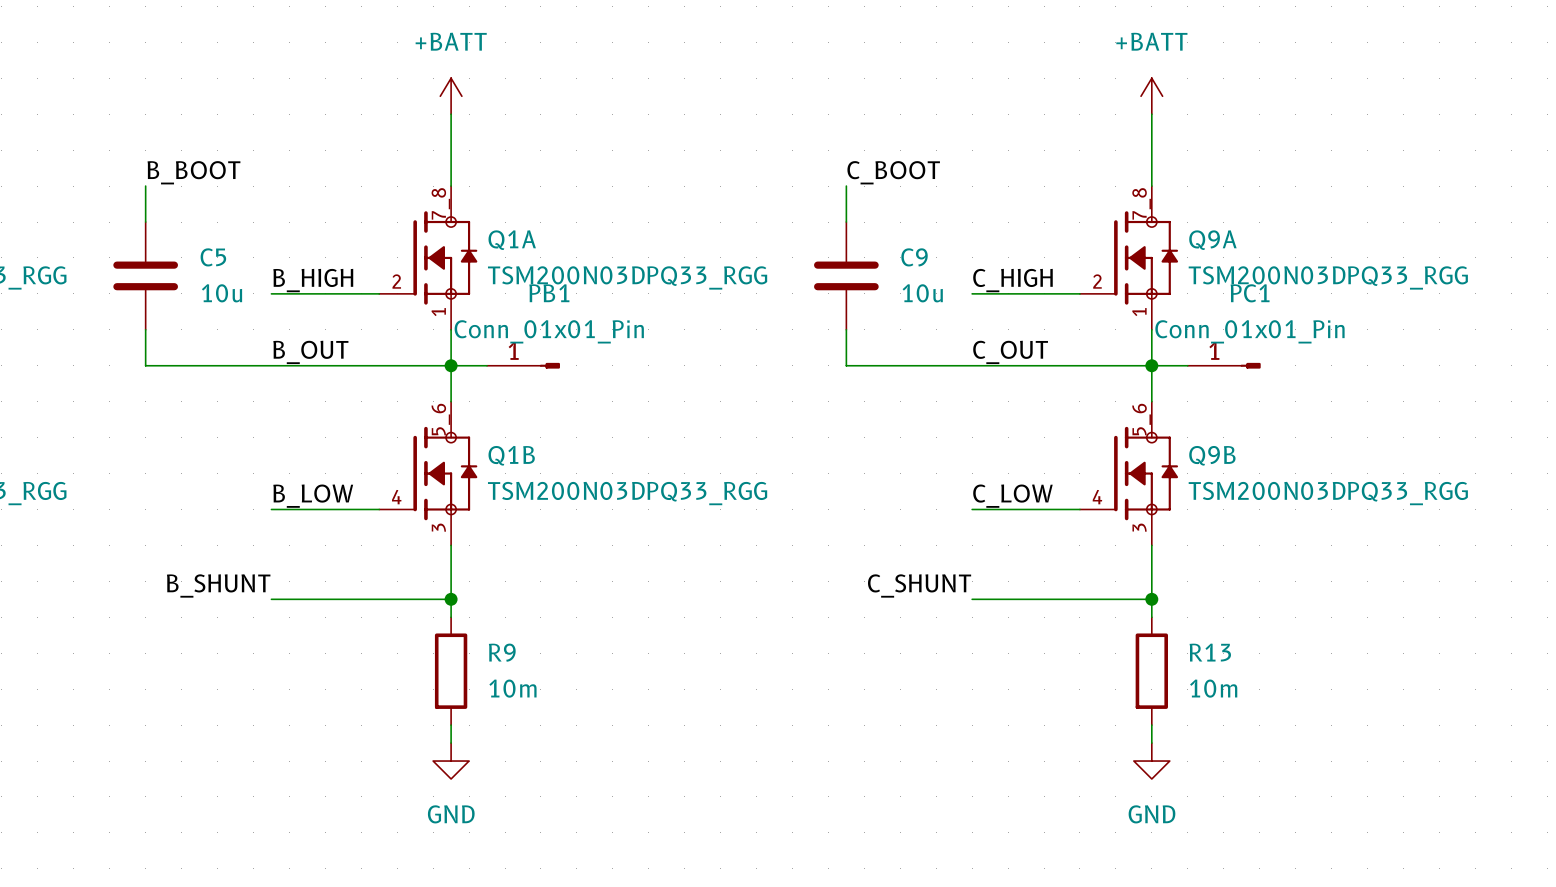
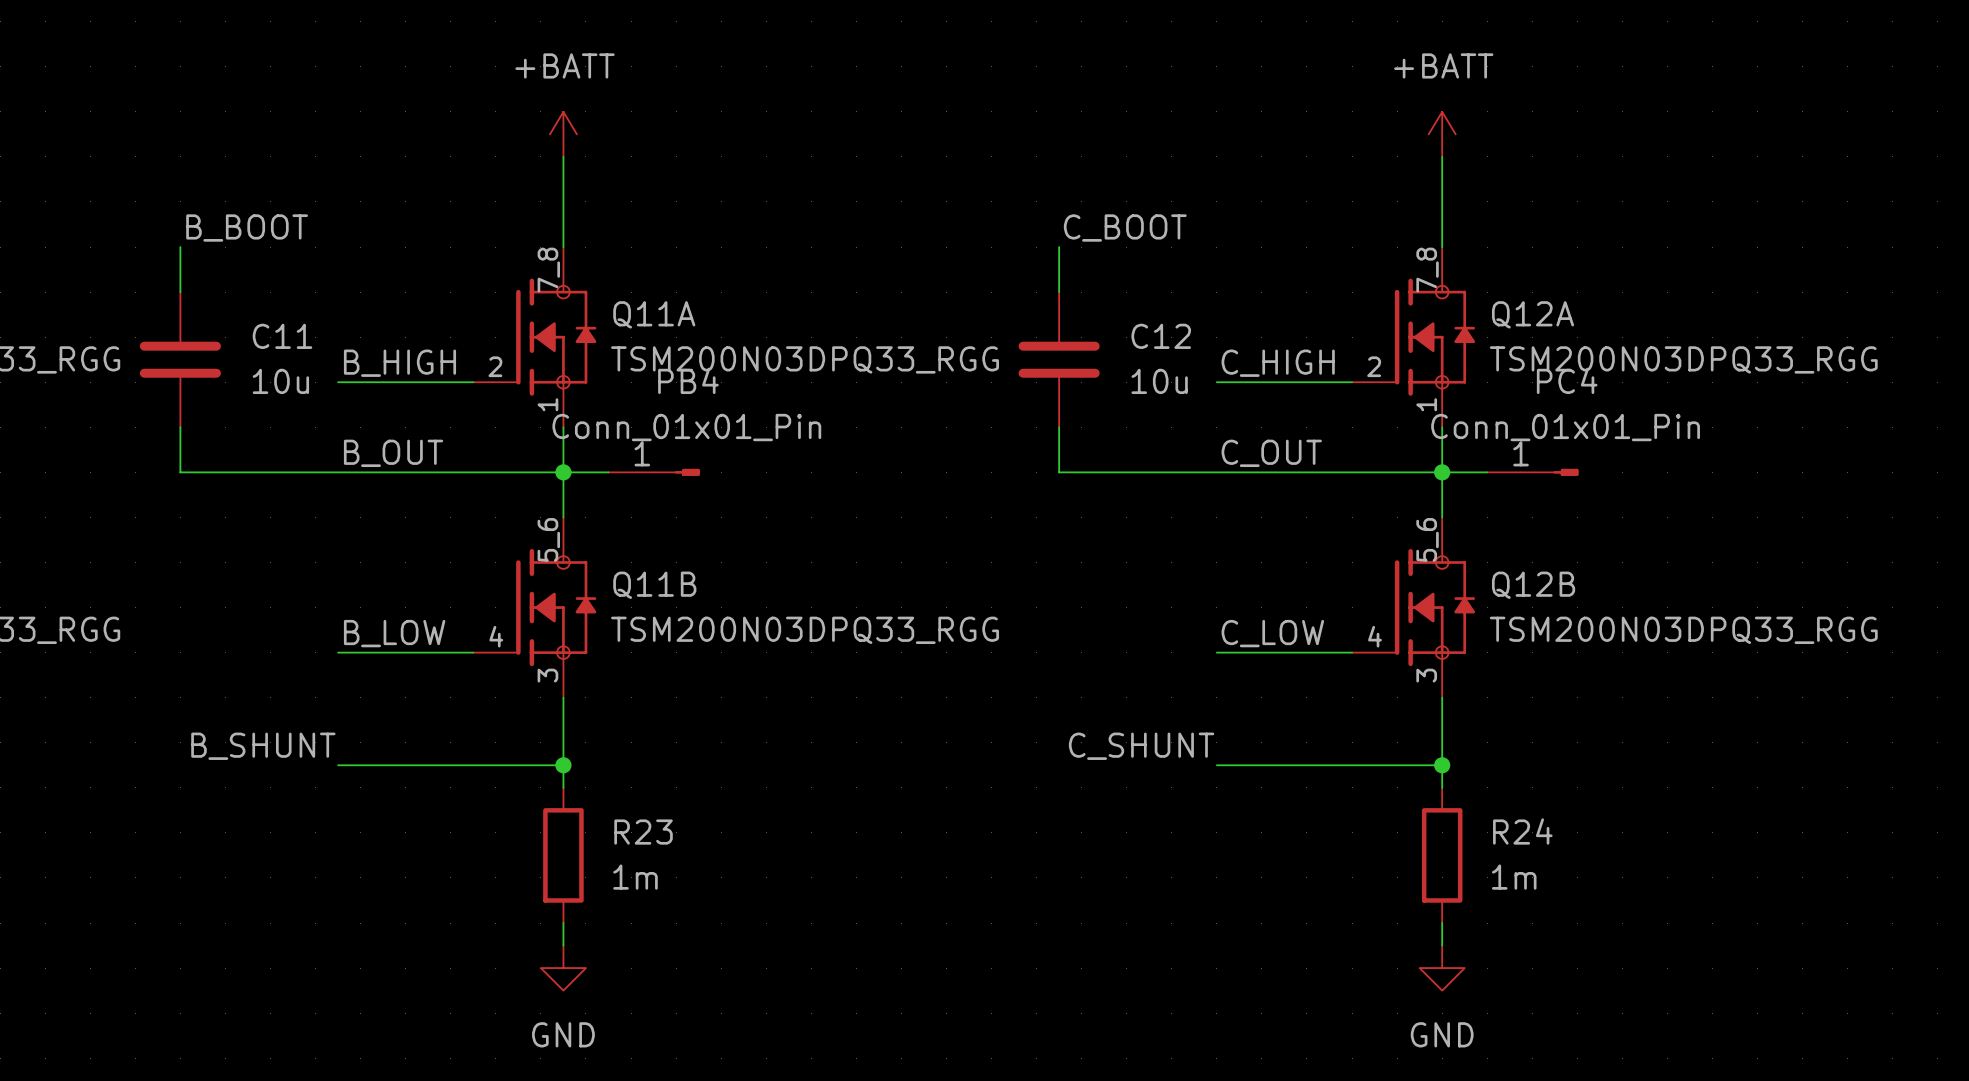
Q1A name: Q1A (512, 240) -> Q11A (654, 314)
Q9A name: Q9A (1212, 240) -> Q12A (1533, 314)
C5 name: C5 (213, 257) -> C11 (282, 336)
C9 name: C9 (914, 257) -> C12 (1161, 336)
PB1 name: PB1 (549, 293) -> PB4 (688, 380)
PC1 name: PC1 (1250, 293) -> PC4 (1567, 380)
Q1B name: Q1B (511, 455) -> Q11B (654, 585)
Q9B name: Q9B (1212, 455) -> Q12B (1533, 585)
R9 name: R9 (502, 652) -> R23 (643, 832)
R13 name: R13 (1210, 652) -> R24 (1522, 831)
R9 value: 10m (512, 688) -> 1m (635, 877)
R13 value: 10m (1213, 688) -> 1m (1514, 877)

